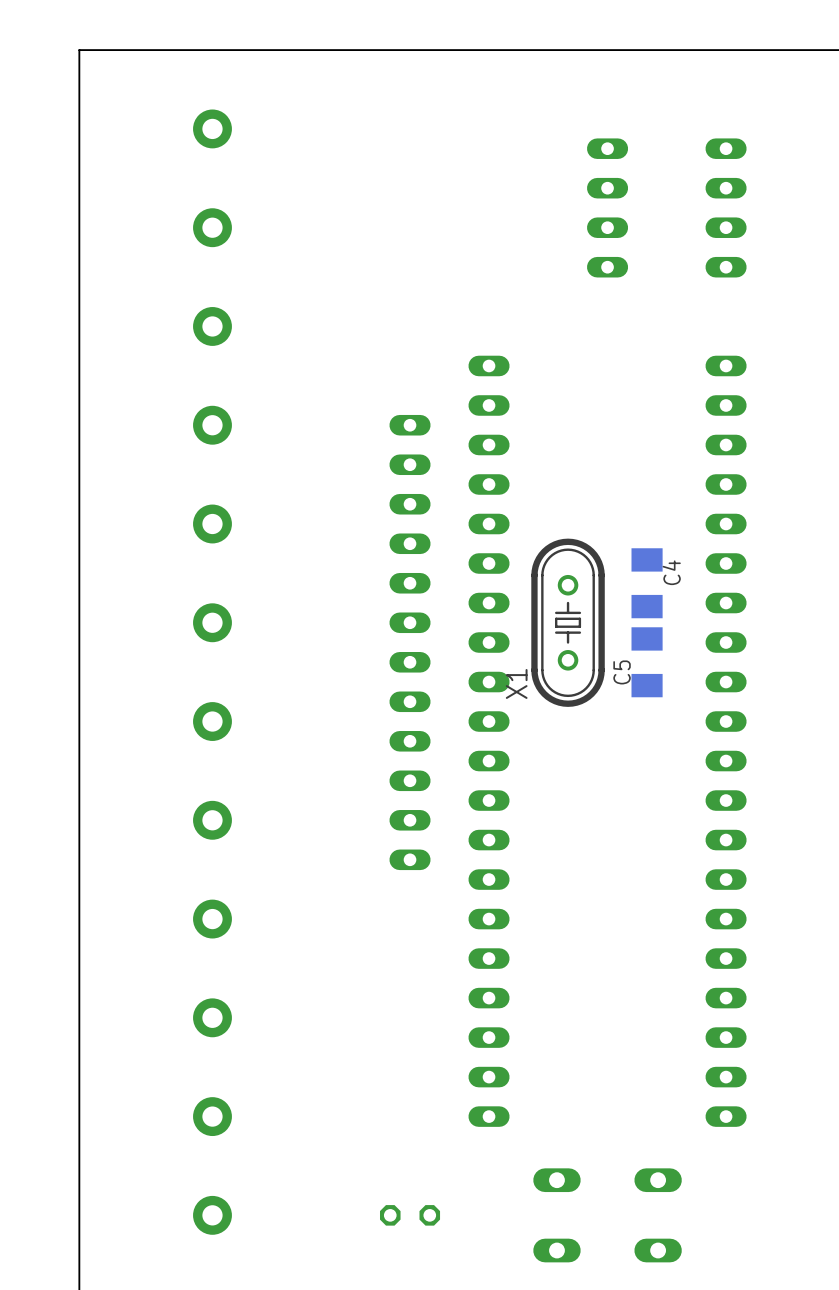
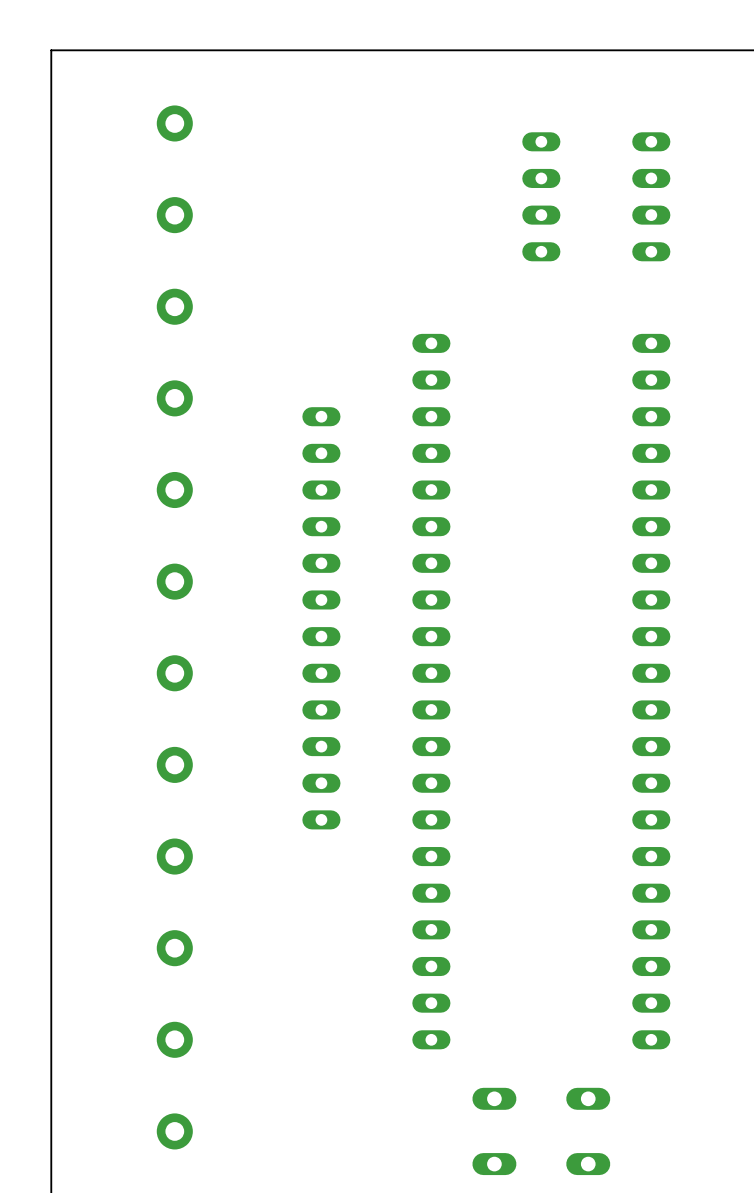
C4: (647, 583) -> none
X1: (568, 622) -> none
part position: (410, 642) -> (321, 618)
C5: (647, 662) -> none
part: (410, 1215) -> none

